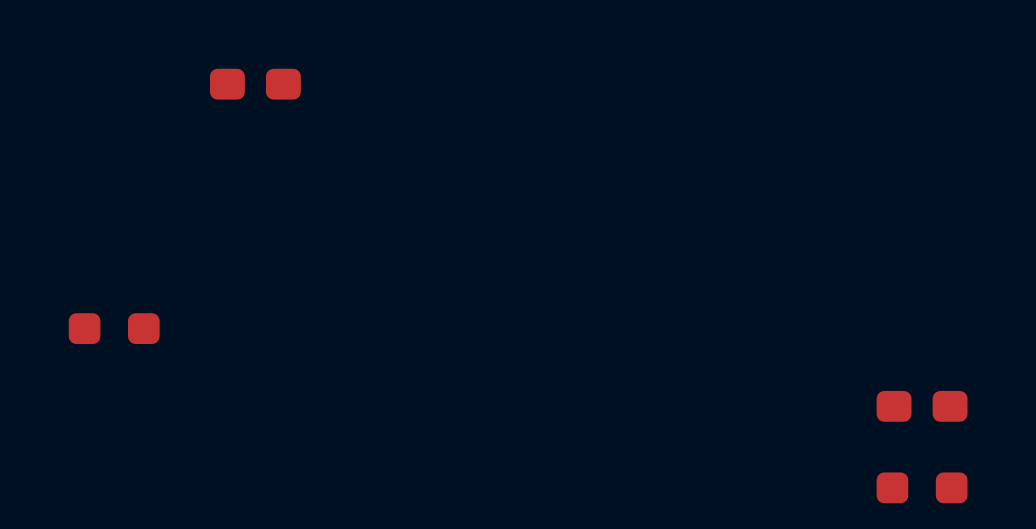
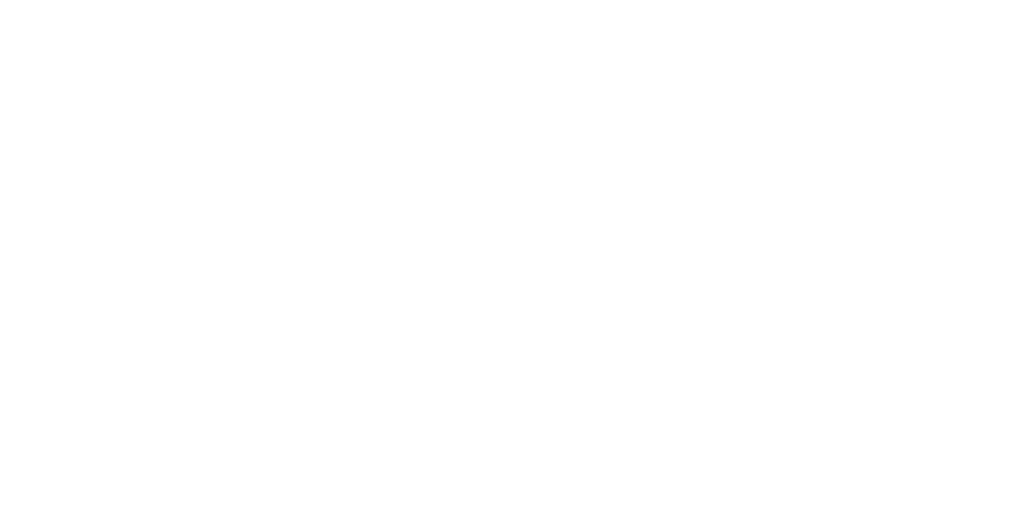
part: (255, 84) -> none
part: (114, 328) -> none
part: (922, 406) -> none
part: (922, 487) -> none

